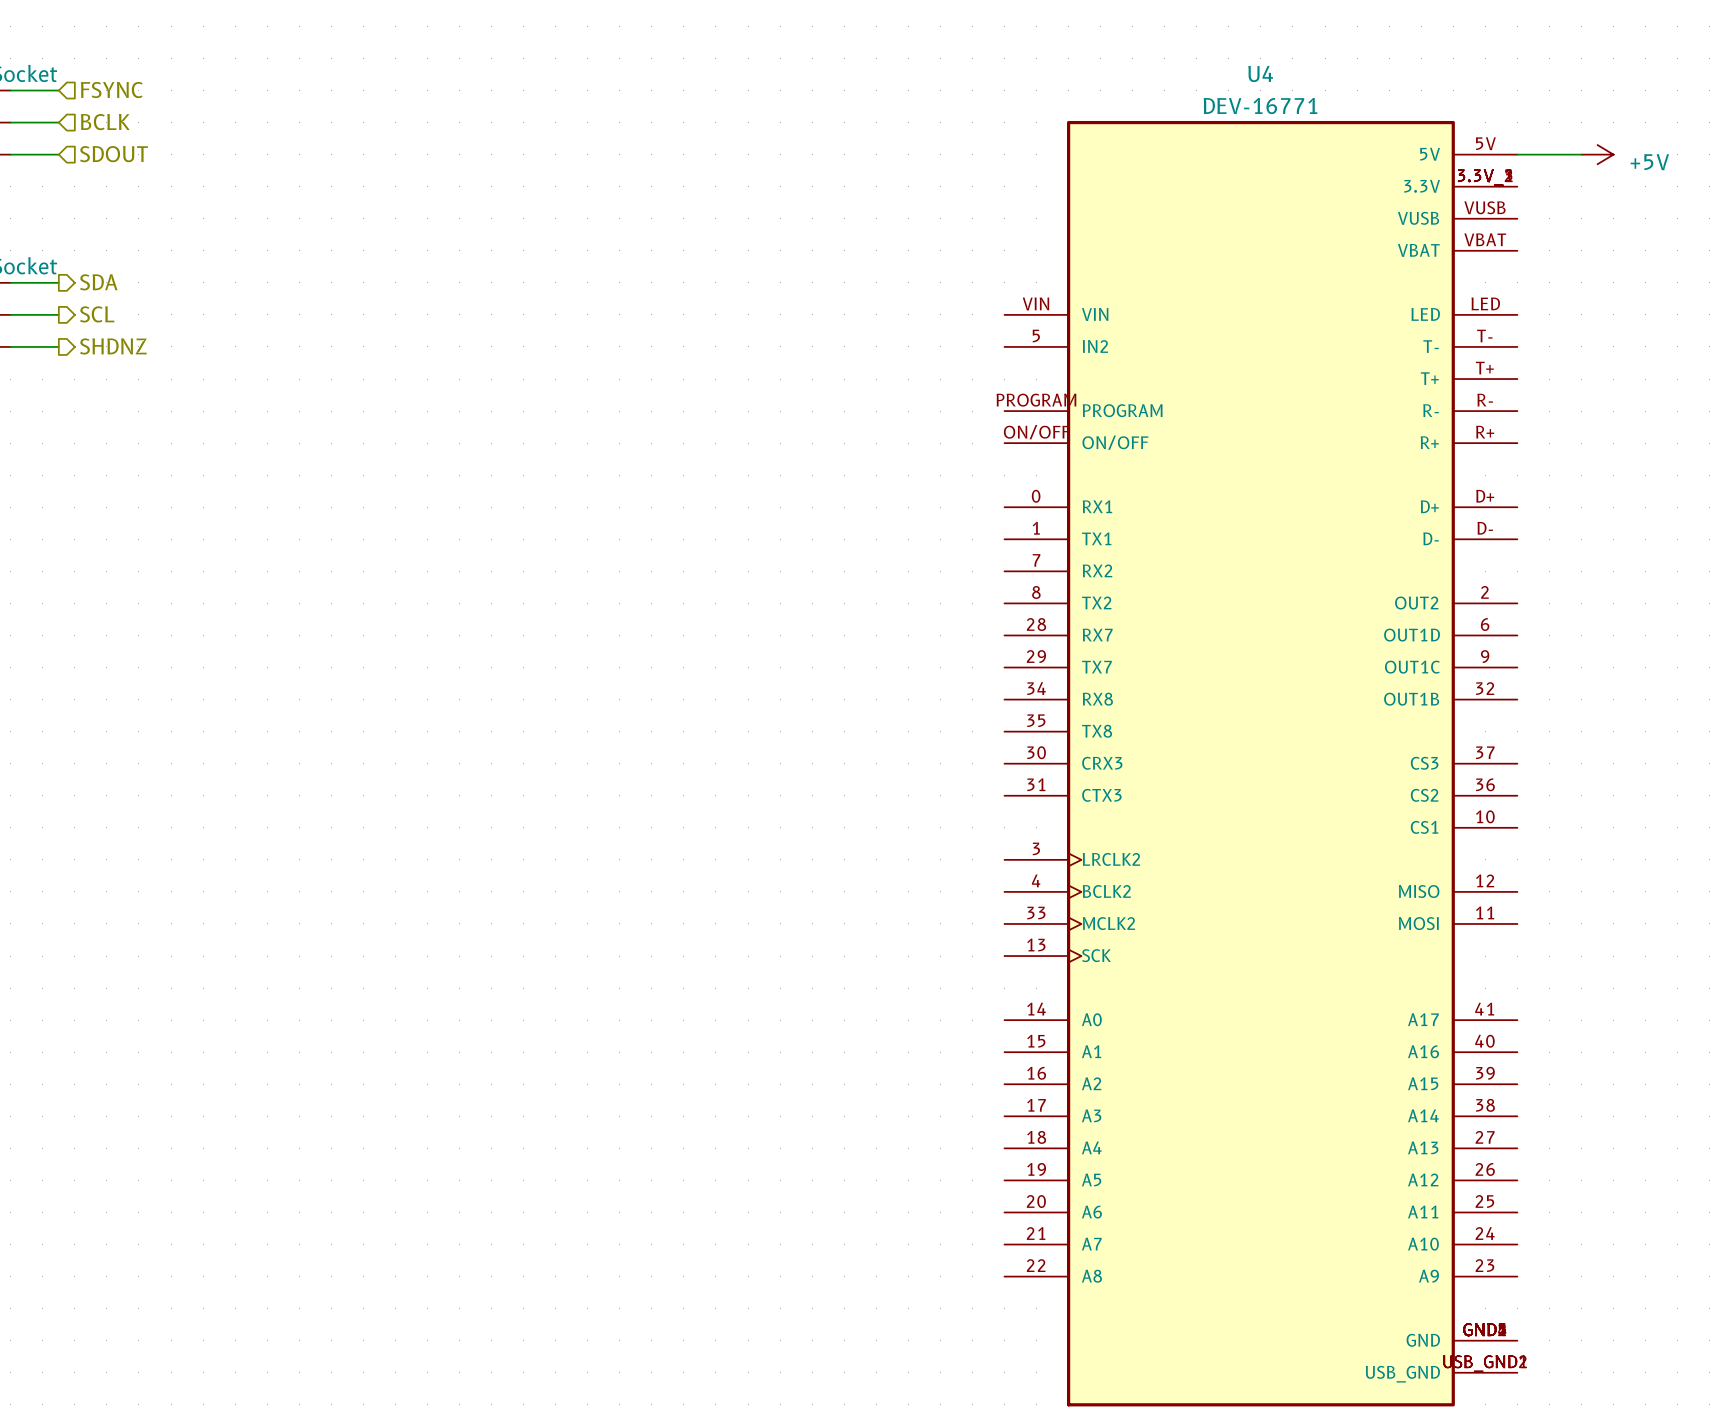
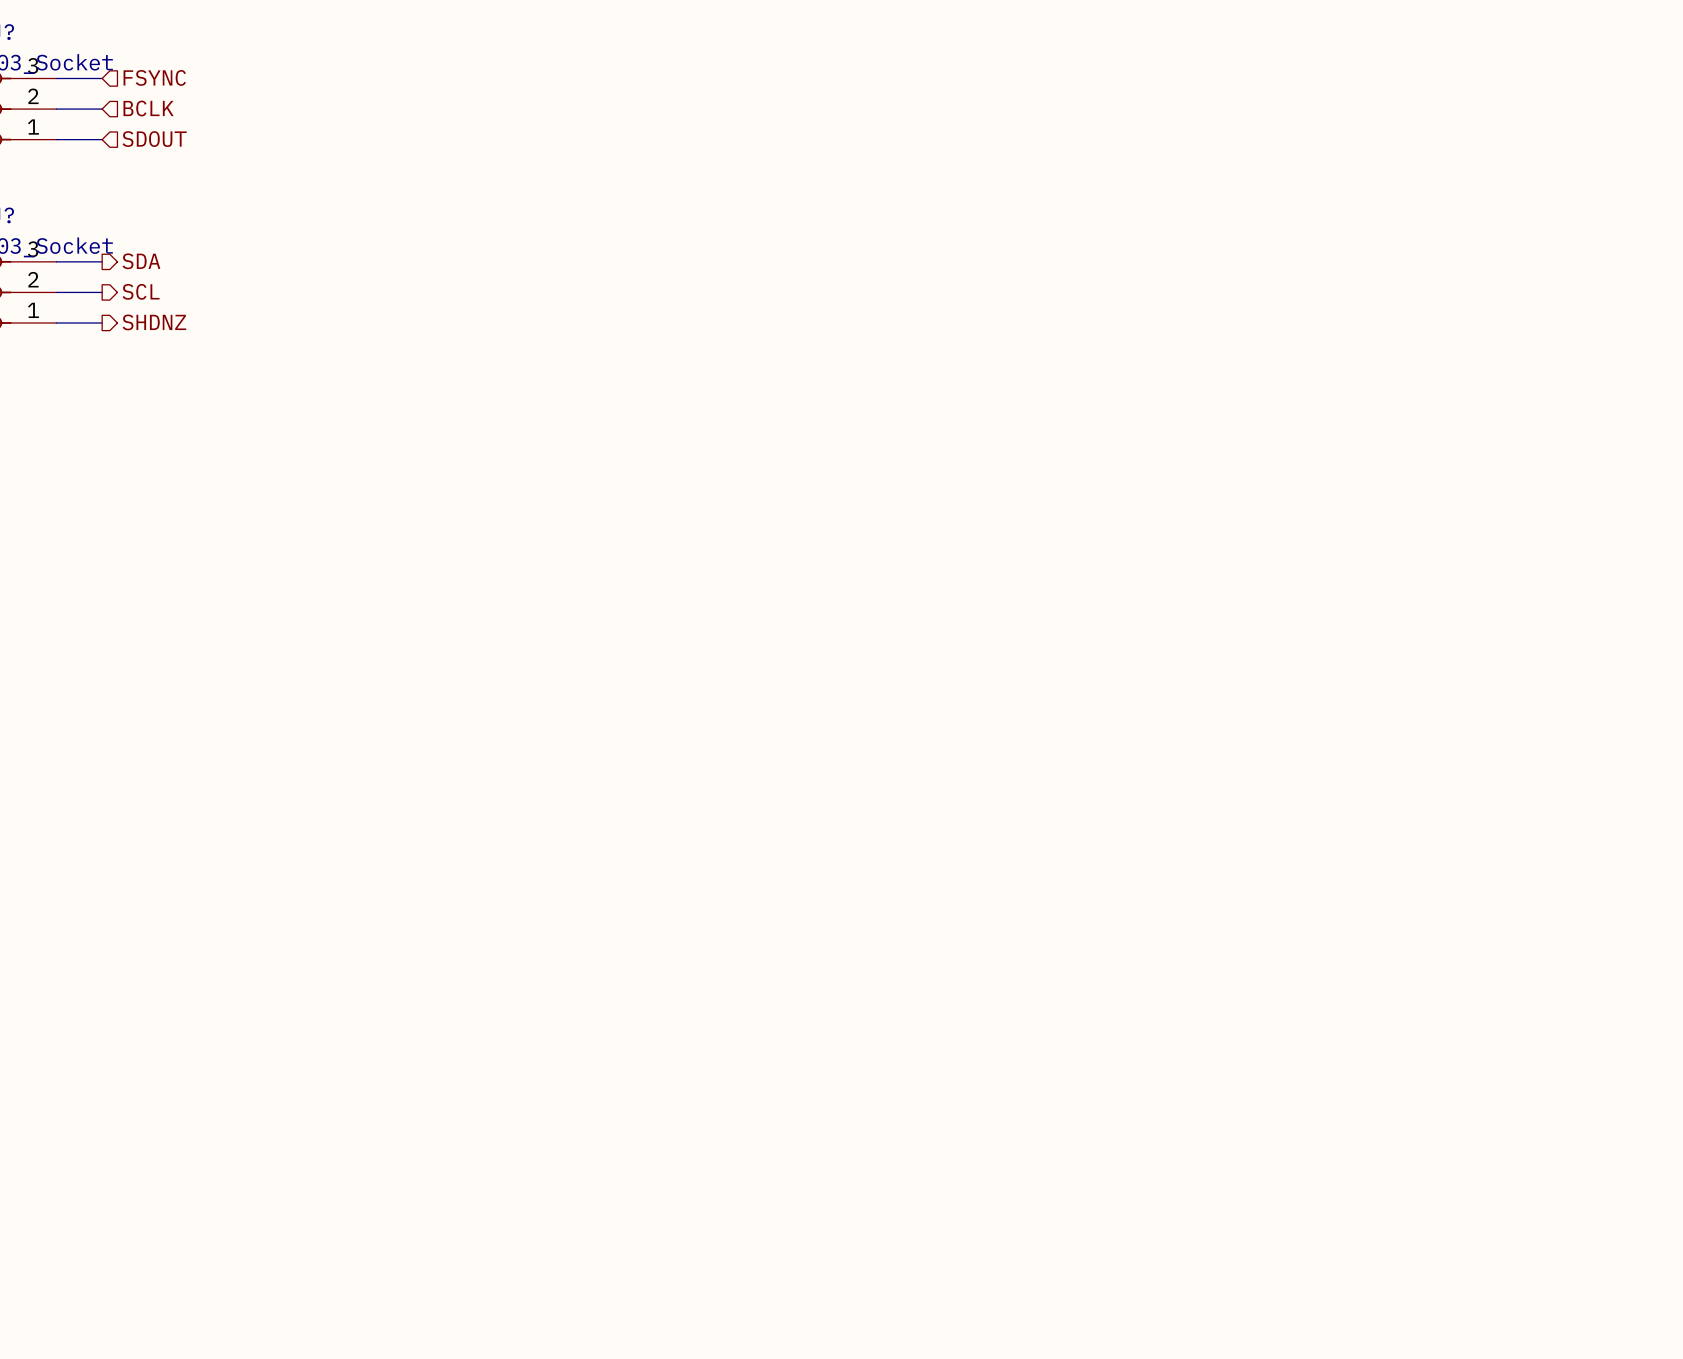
wire: (1517, 154) (1581, 154) -> none
power symbol: +5V (1597, 154) -> none
U4: DEV-16771 (1260, 763) -> none

